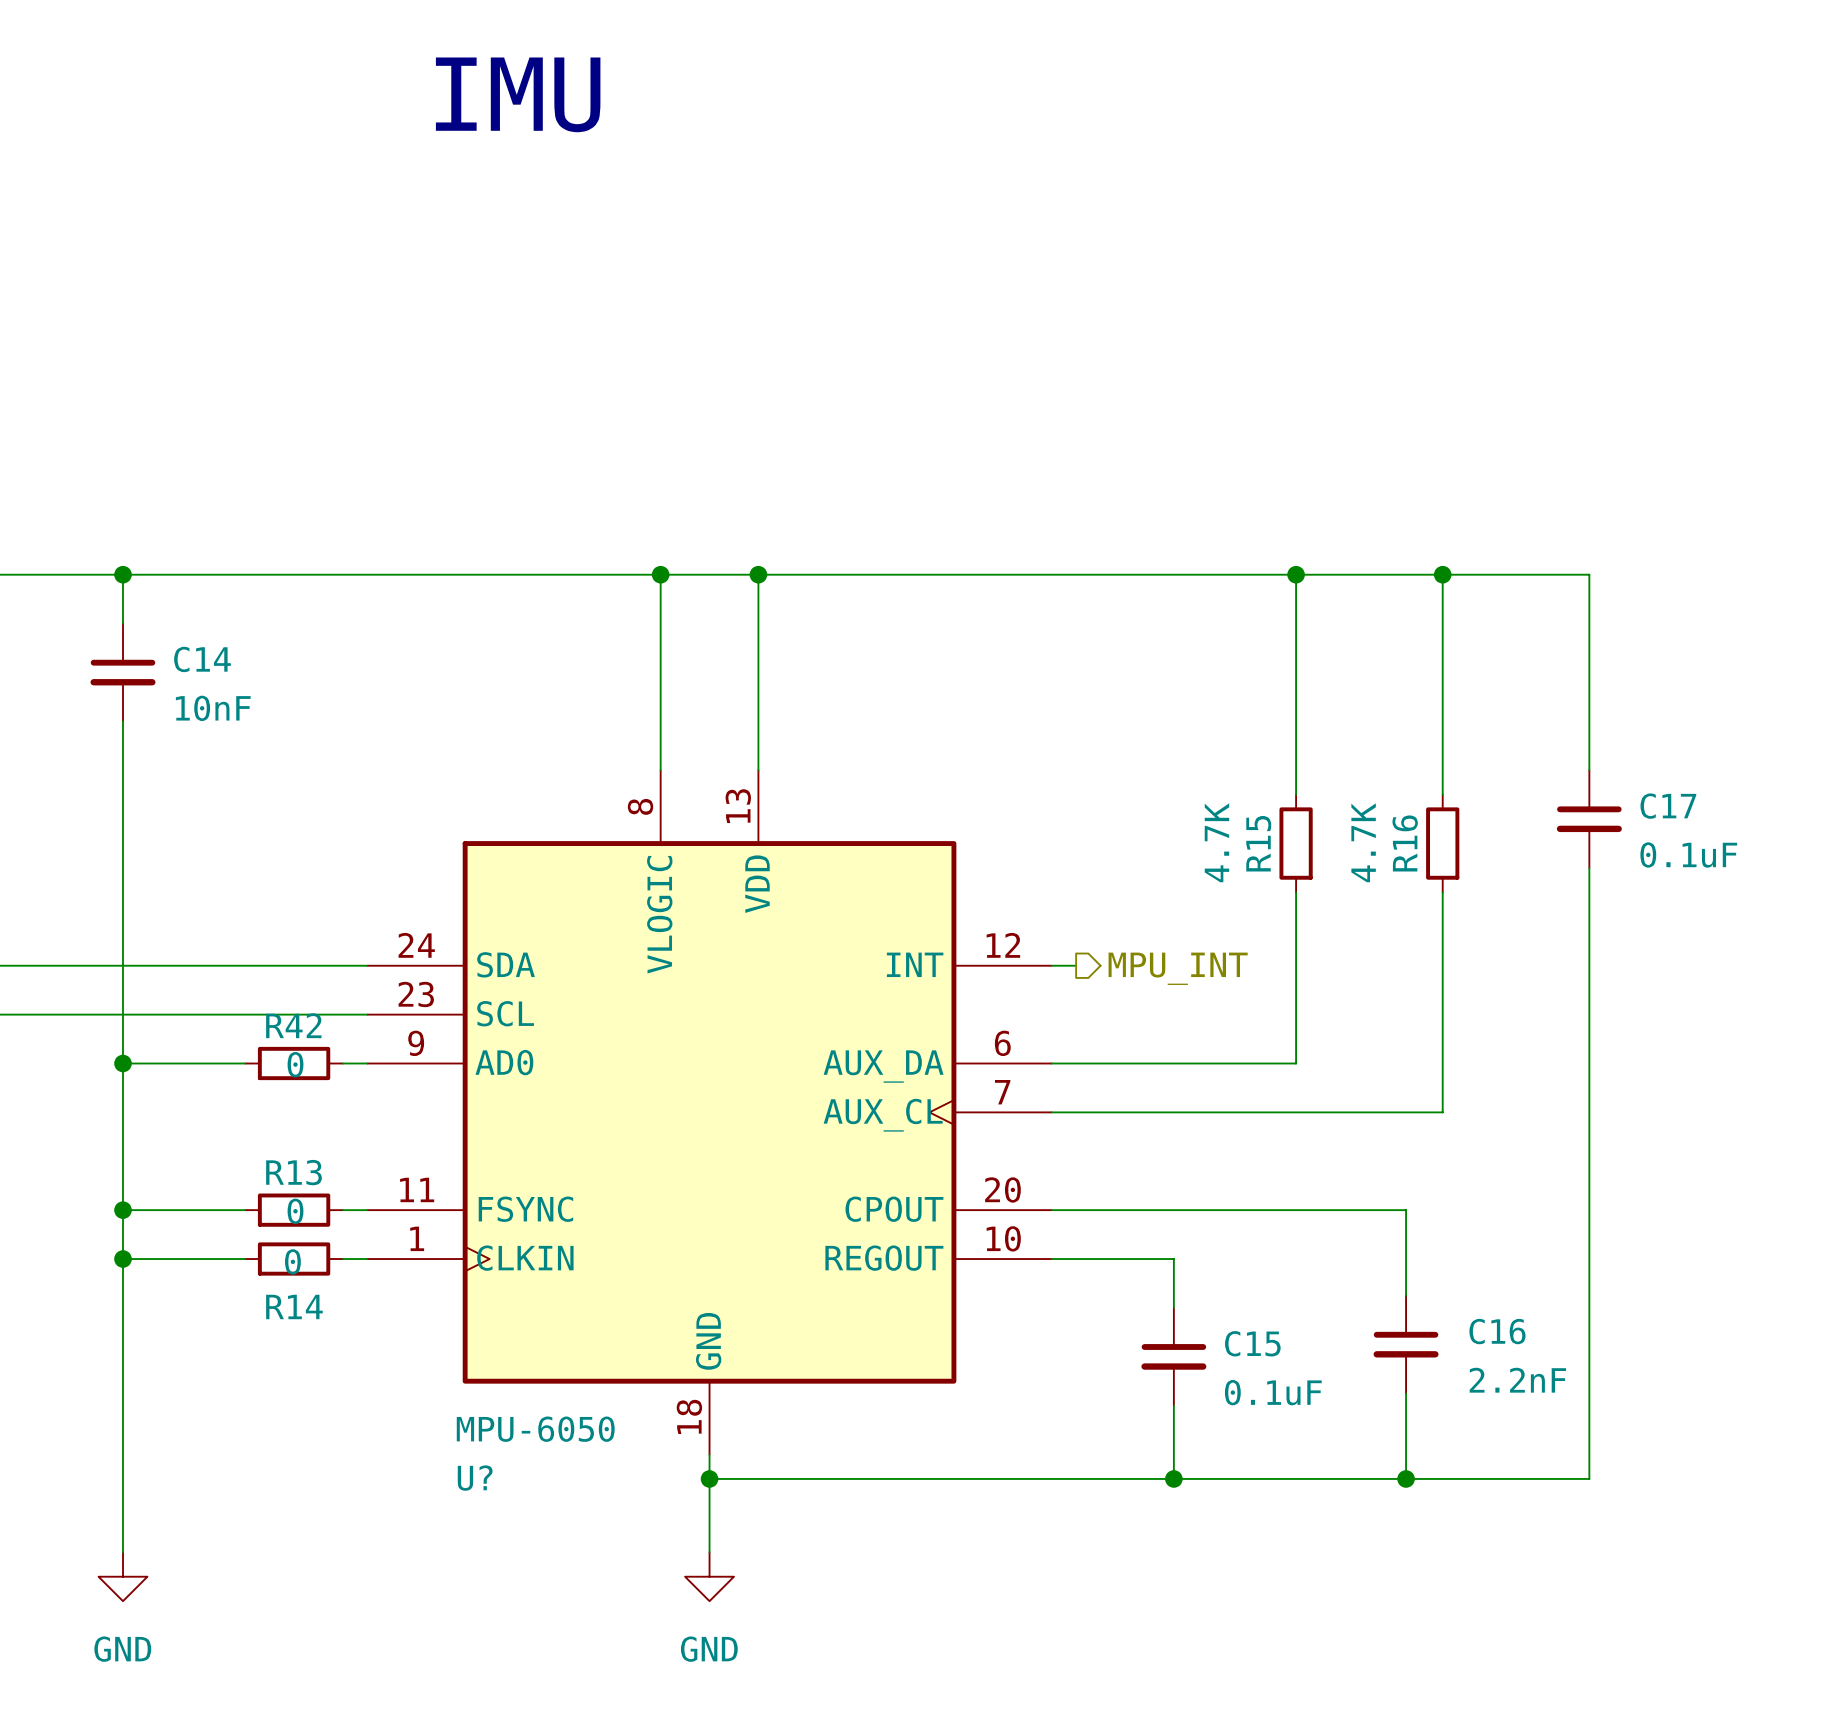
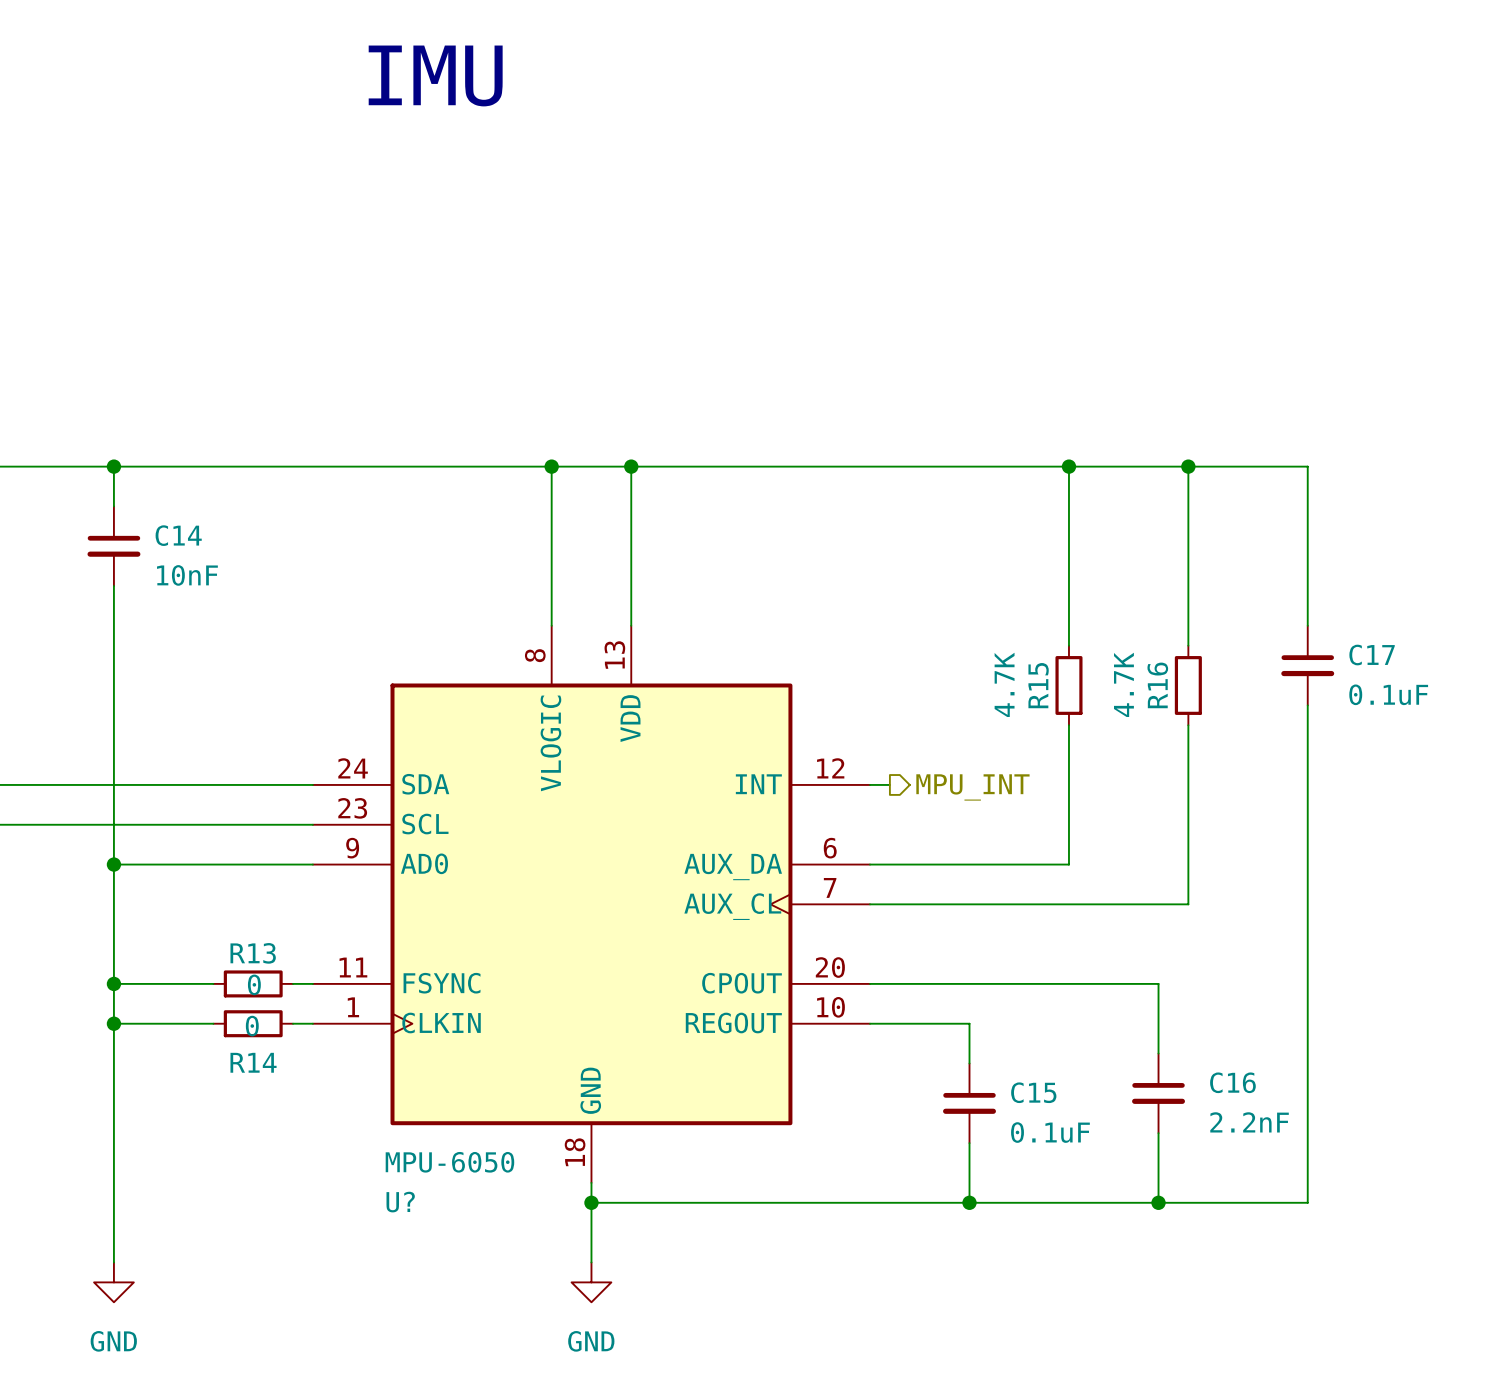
wire: none -> (213, 864) (293, 864)
R42: 0 (294, 1063) -> none

